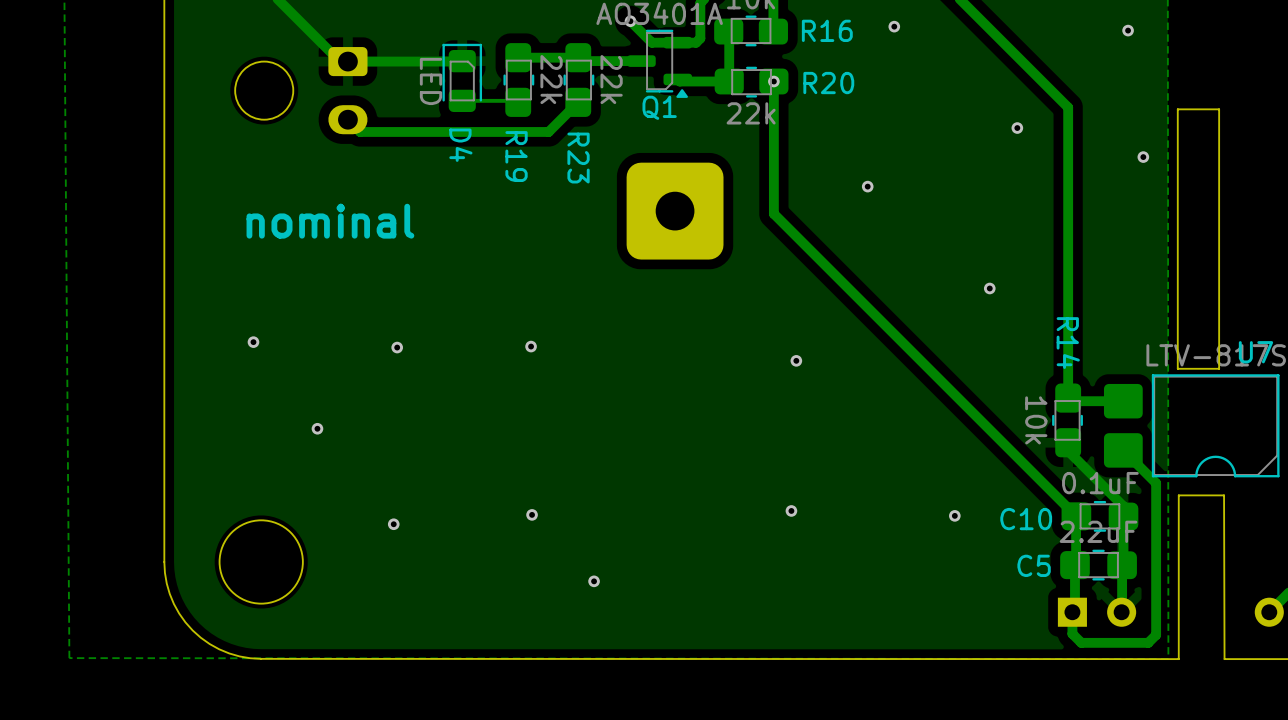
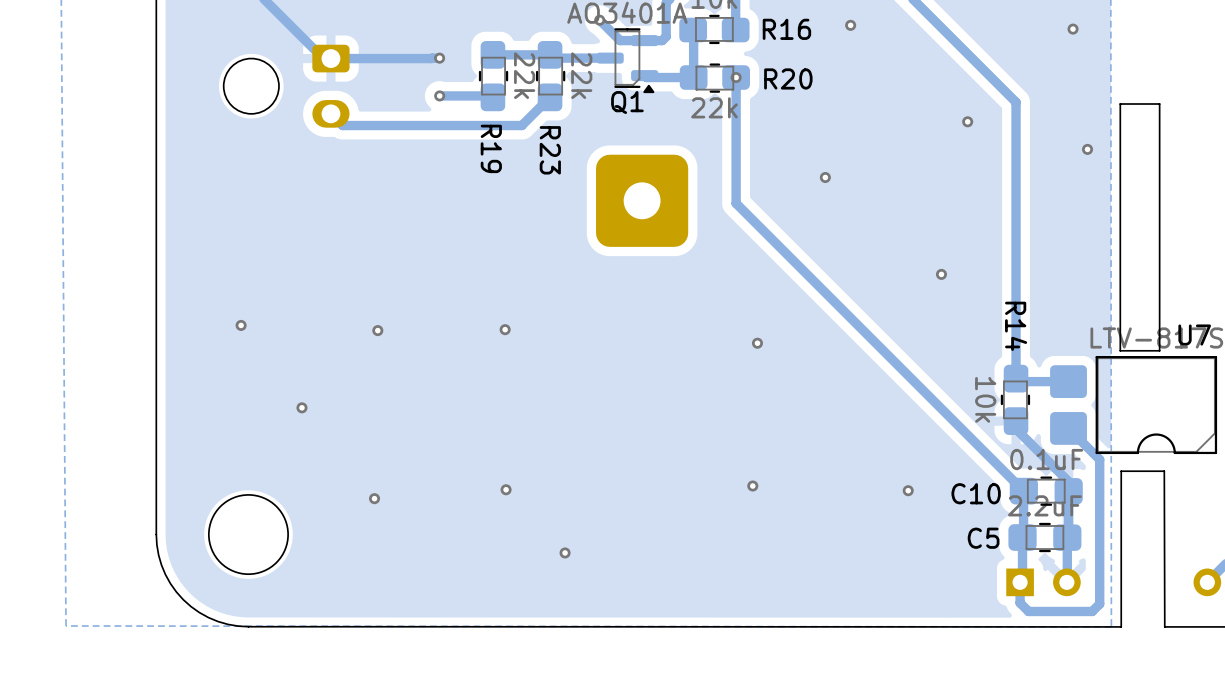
via: none -> (439, 58)
D4: LED (462, 77) -> none
via: none -> (439, 95)
track width: thin (516, 100) (462, 100) -> thick (491, 95) (439, 95)
text: nominal (330, 221) -> none

